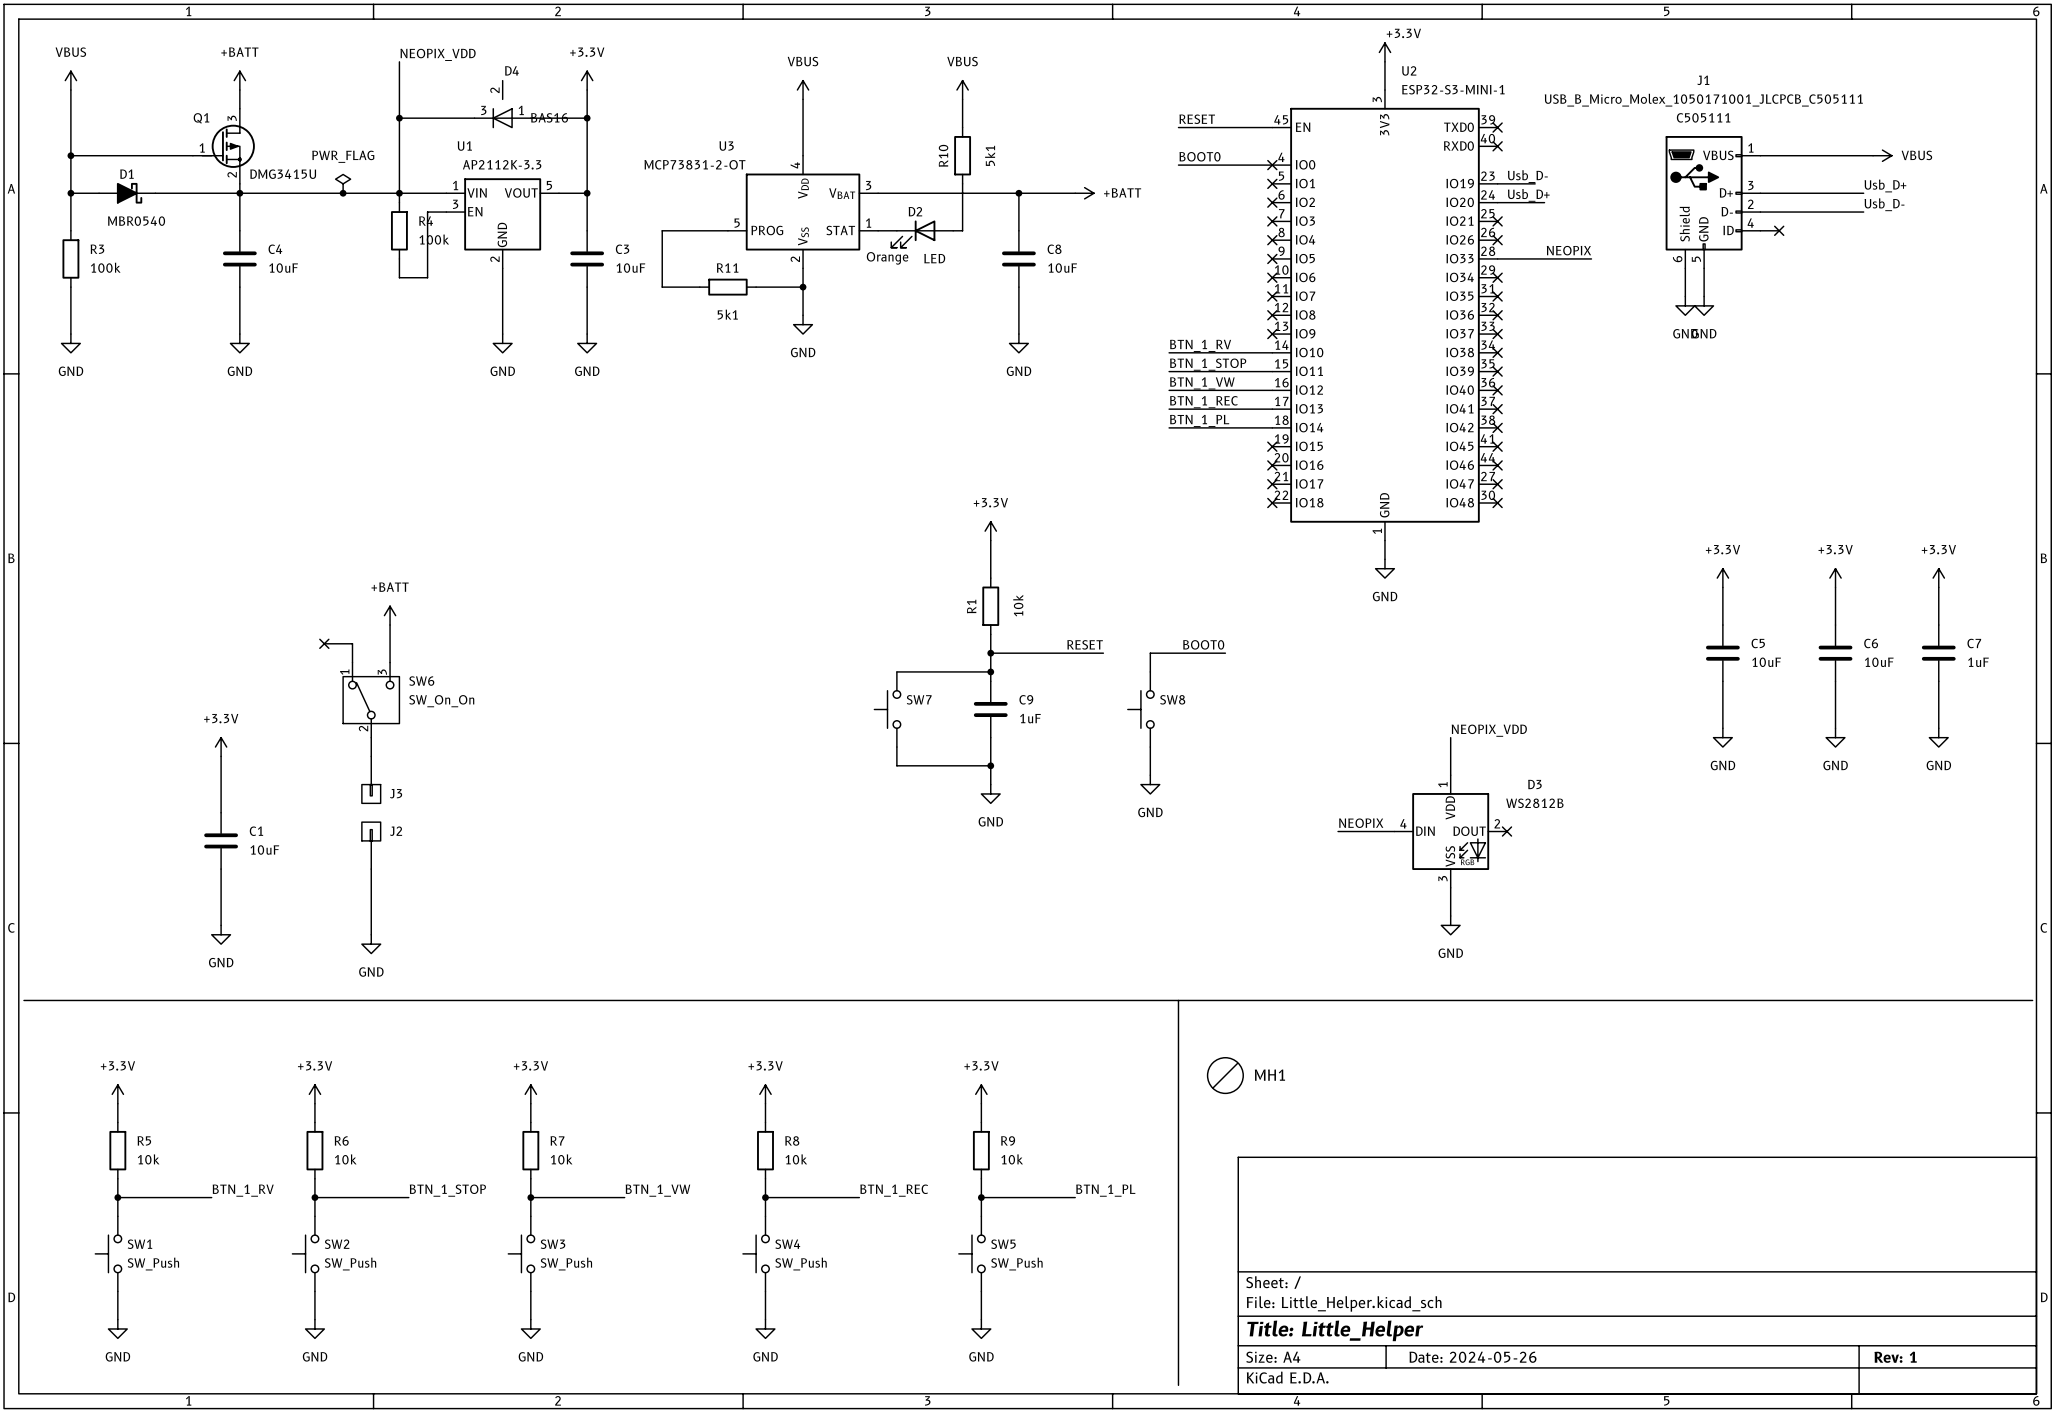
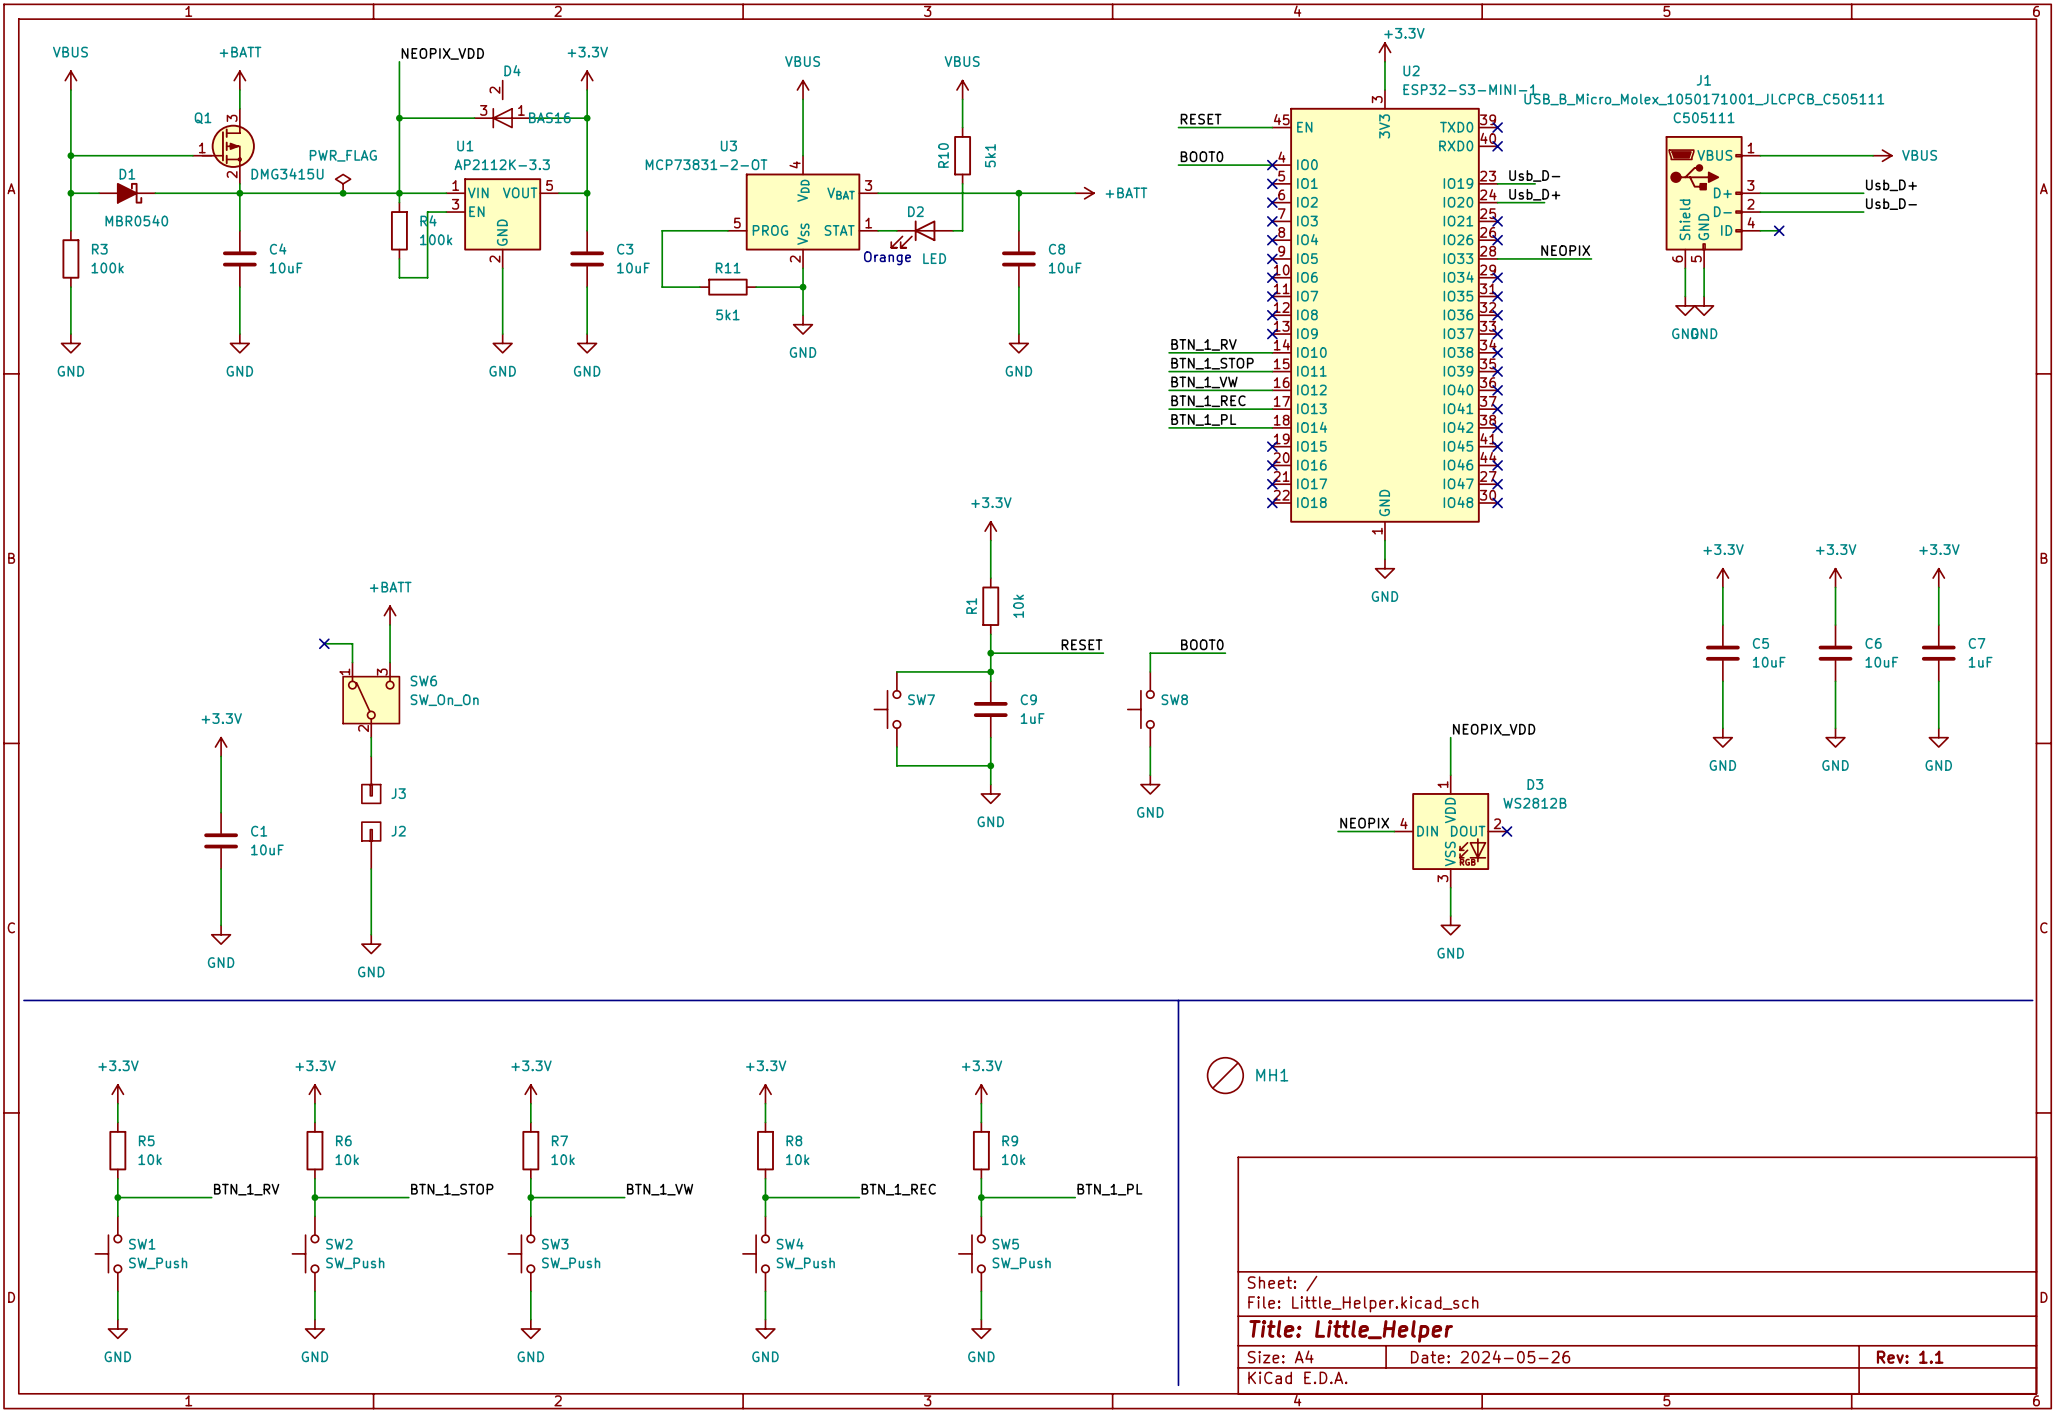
title block: Rev: 1 (1895, 1357) -> Rev: 1.1 (1910, 1357)

